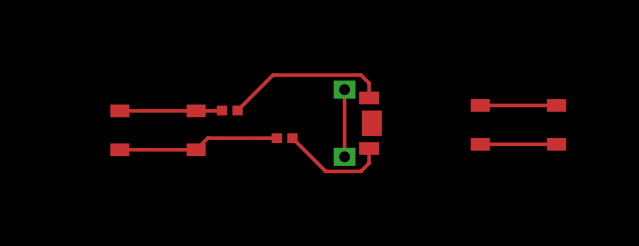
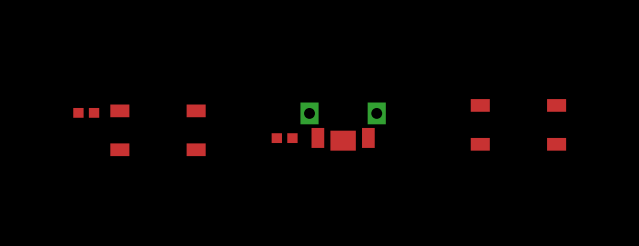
top track: (344, 89) (344, 156) -> none
top track: (369, 97) (369, 83) (360, 75) (273, 75) (237, 110) -> none
top track: (556, 105) (480, 105) -> none
top track: (221, 110) (119, 110) -> none
part position: (229, 110) -> (86, 112)
part rotation: 0° (357, 123) -> 90° clockwise (343, 126)
top track: (276, 138) (207, 138) (196, 149) (119, 149) -> none
top track: (292, 138) (325, 171) (360, 171) (369, 163) (369, 148) -> none
top track: (556, 144) (480, 144) -> none

